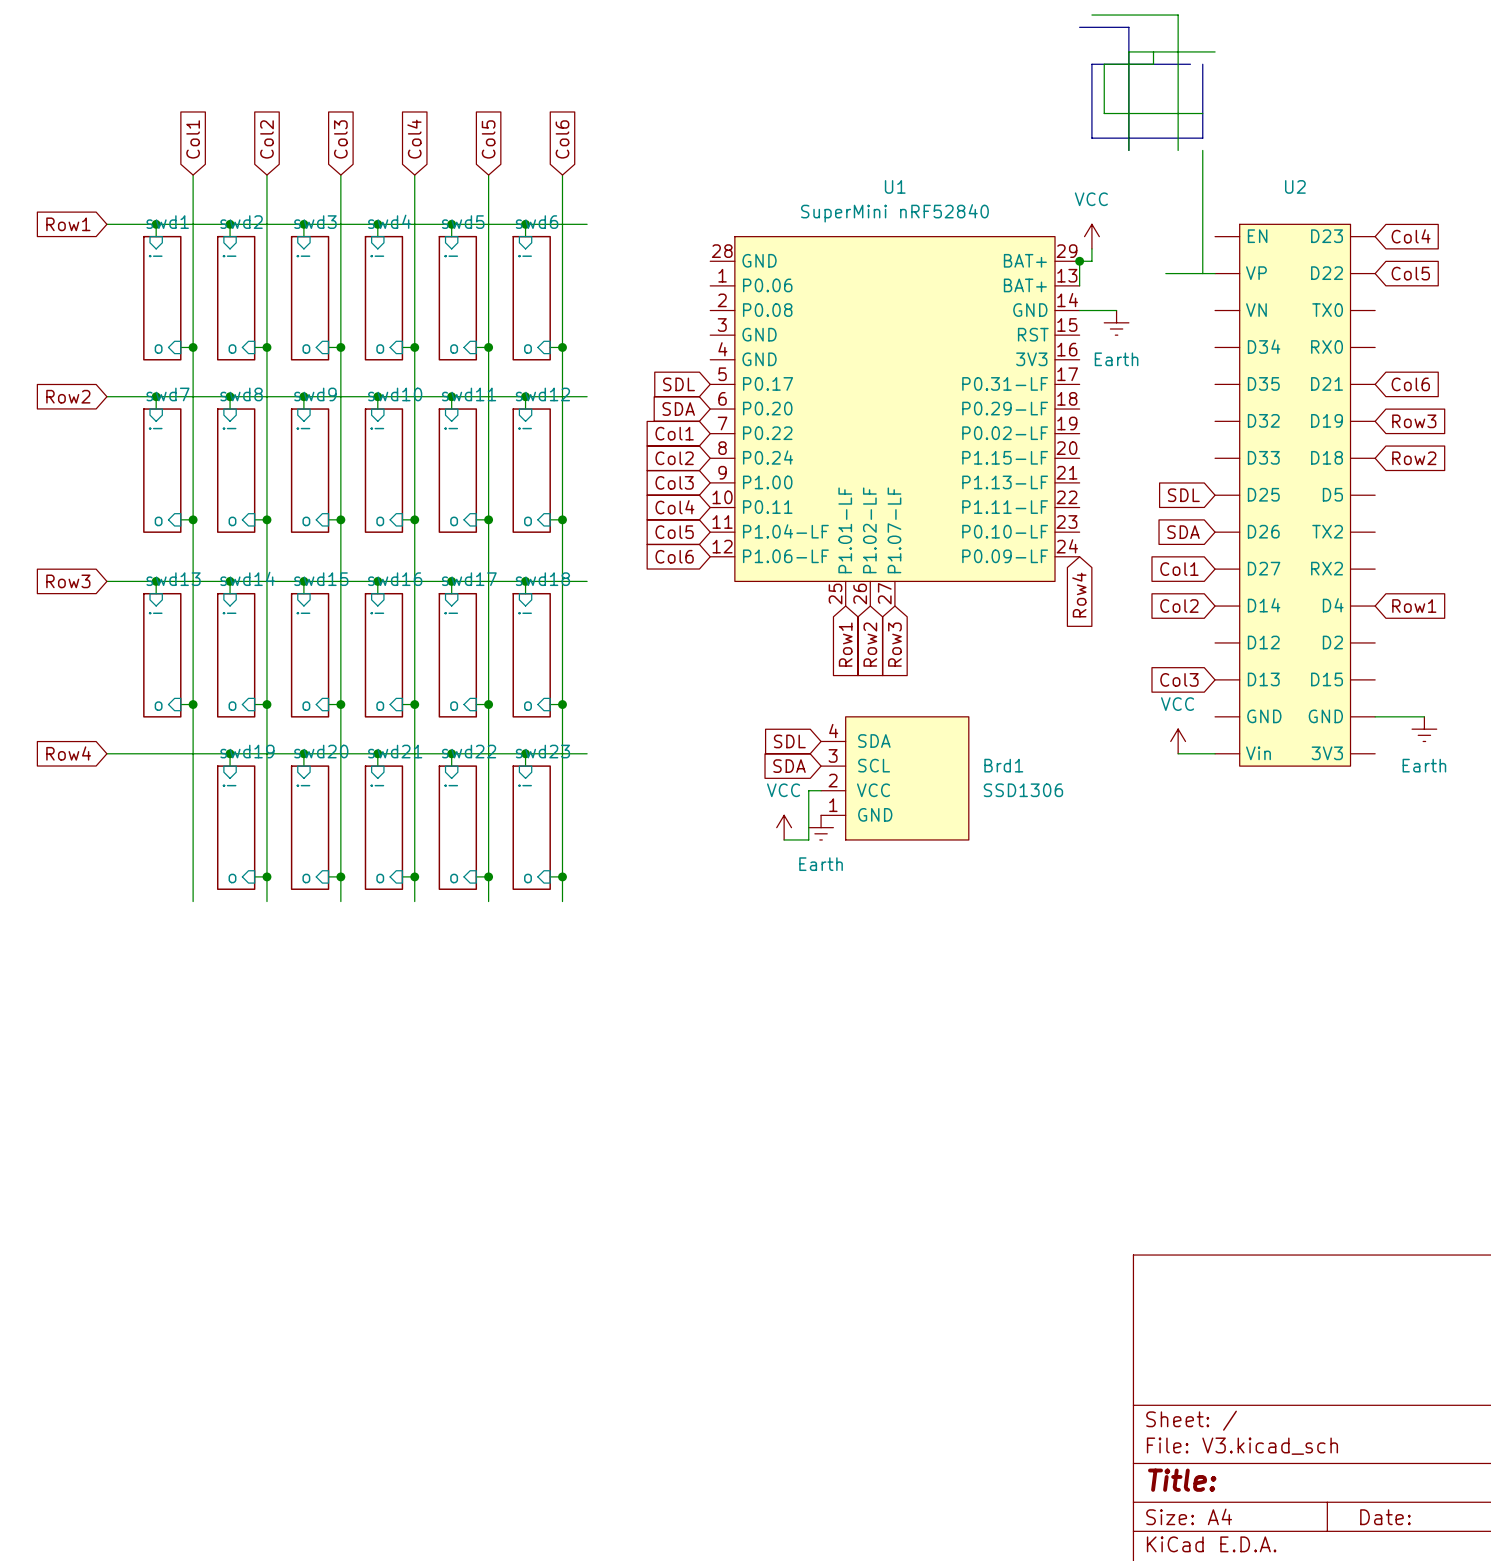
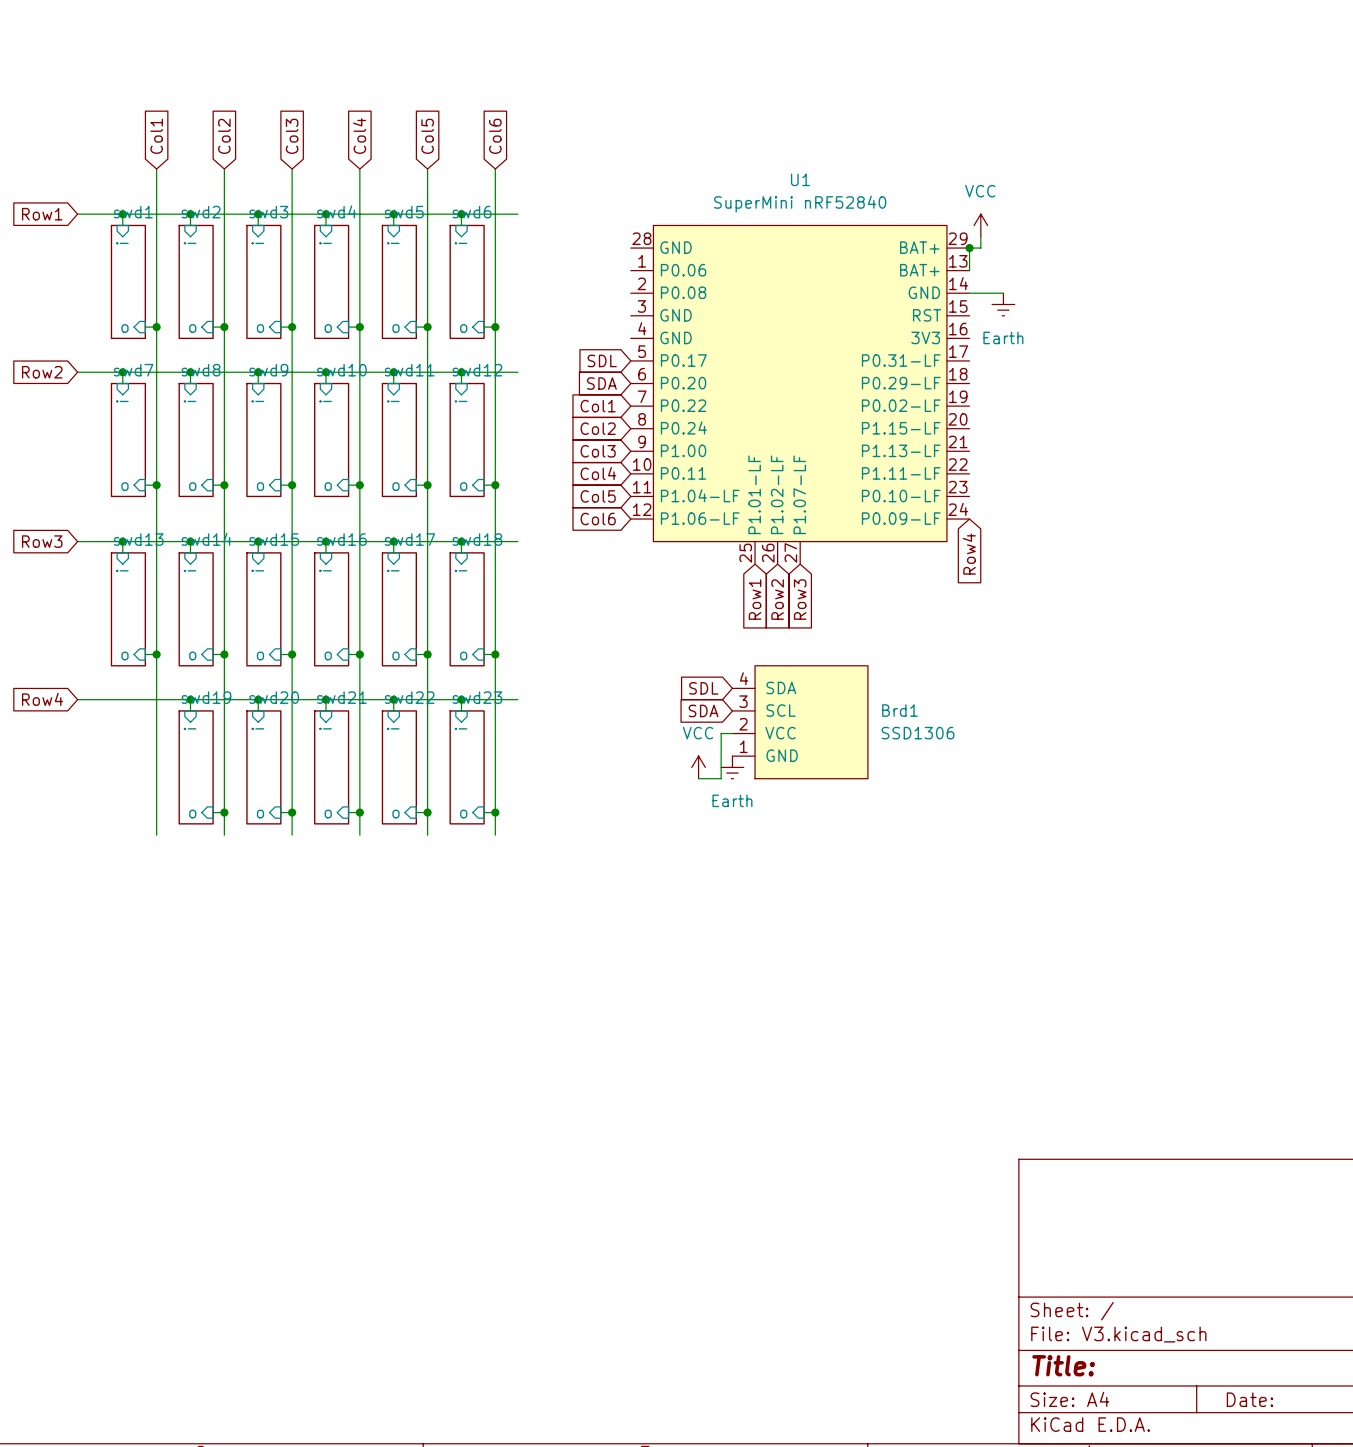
wire: (1091, 15) (1178, 15) (1178, 150) -> none
bus: (1079, 27) (1128, 27) (1128, 150) -> none
wire: (1153, 51) (1153, 64) (1104, 64) (1104, 113) (1202, 113) -> none
wire: (1215, 51) (1128, 51) (1128, 150) -> none
bus: (1190, 64) (1091, 64) (1091, 138) (1202, 138) (1202, 64) -> none
wire: (1202, 150) (1202, 273) -> none
global label: Col4 (1411, 236) -> none
wire: (1165, 273) (1215, 273) -> none
global label: Col5 (1410, 273) -> none
global label: Col6 (1410, 384) -> none
global label: Row3 (1414, 421) -> none
global label: Row2 (1414, 458) -> none
global label: SDL (1183, 495) -> none
U2: (1295, 495) -> none
global label: SDA (1183, 532) -> none
global label: Col1 (1179, 569) -> none
global label: Col2 (1179, 606) -> none
global label: Row1 (1414, 606) -> none
global label: Col3 (1179, 679) -> none
wire: (1375, 716) (1424, 716) -> none
power symbol: Earth (1424, 729) -> none
power symbol: VCC (1178, 741) -> none
wire: (1178, 753) (1215, 753) -> none

